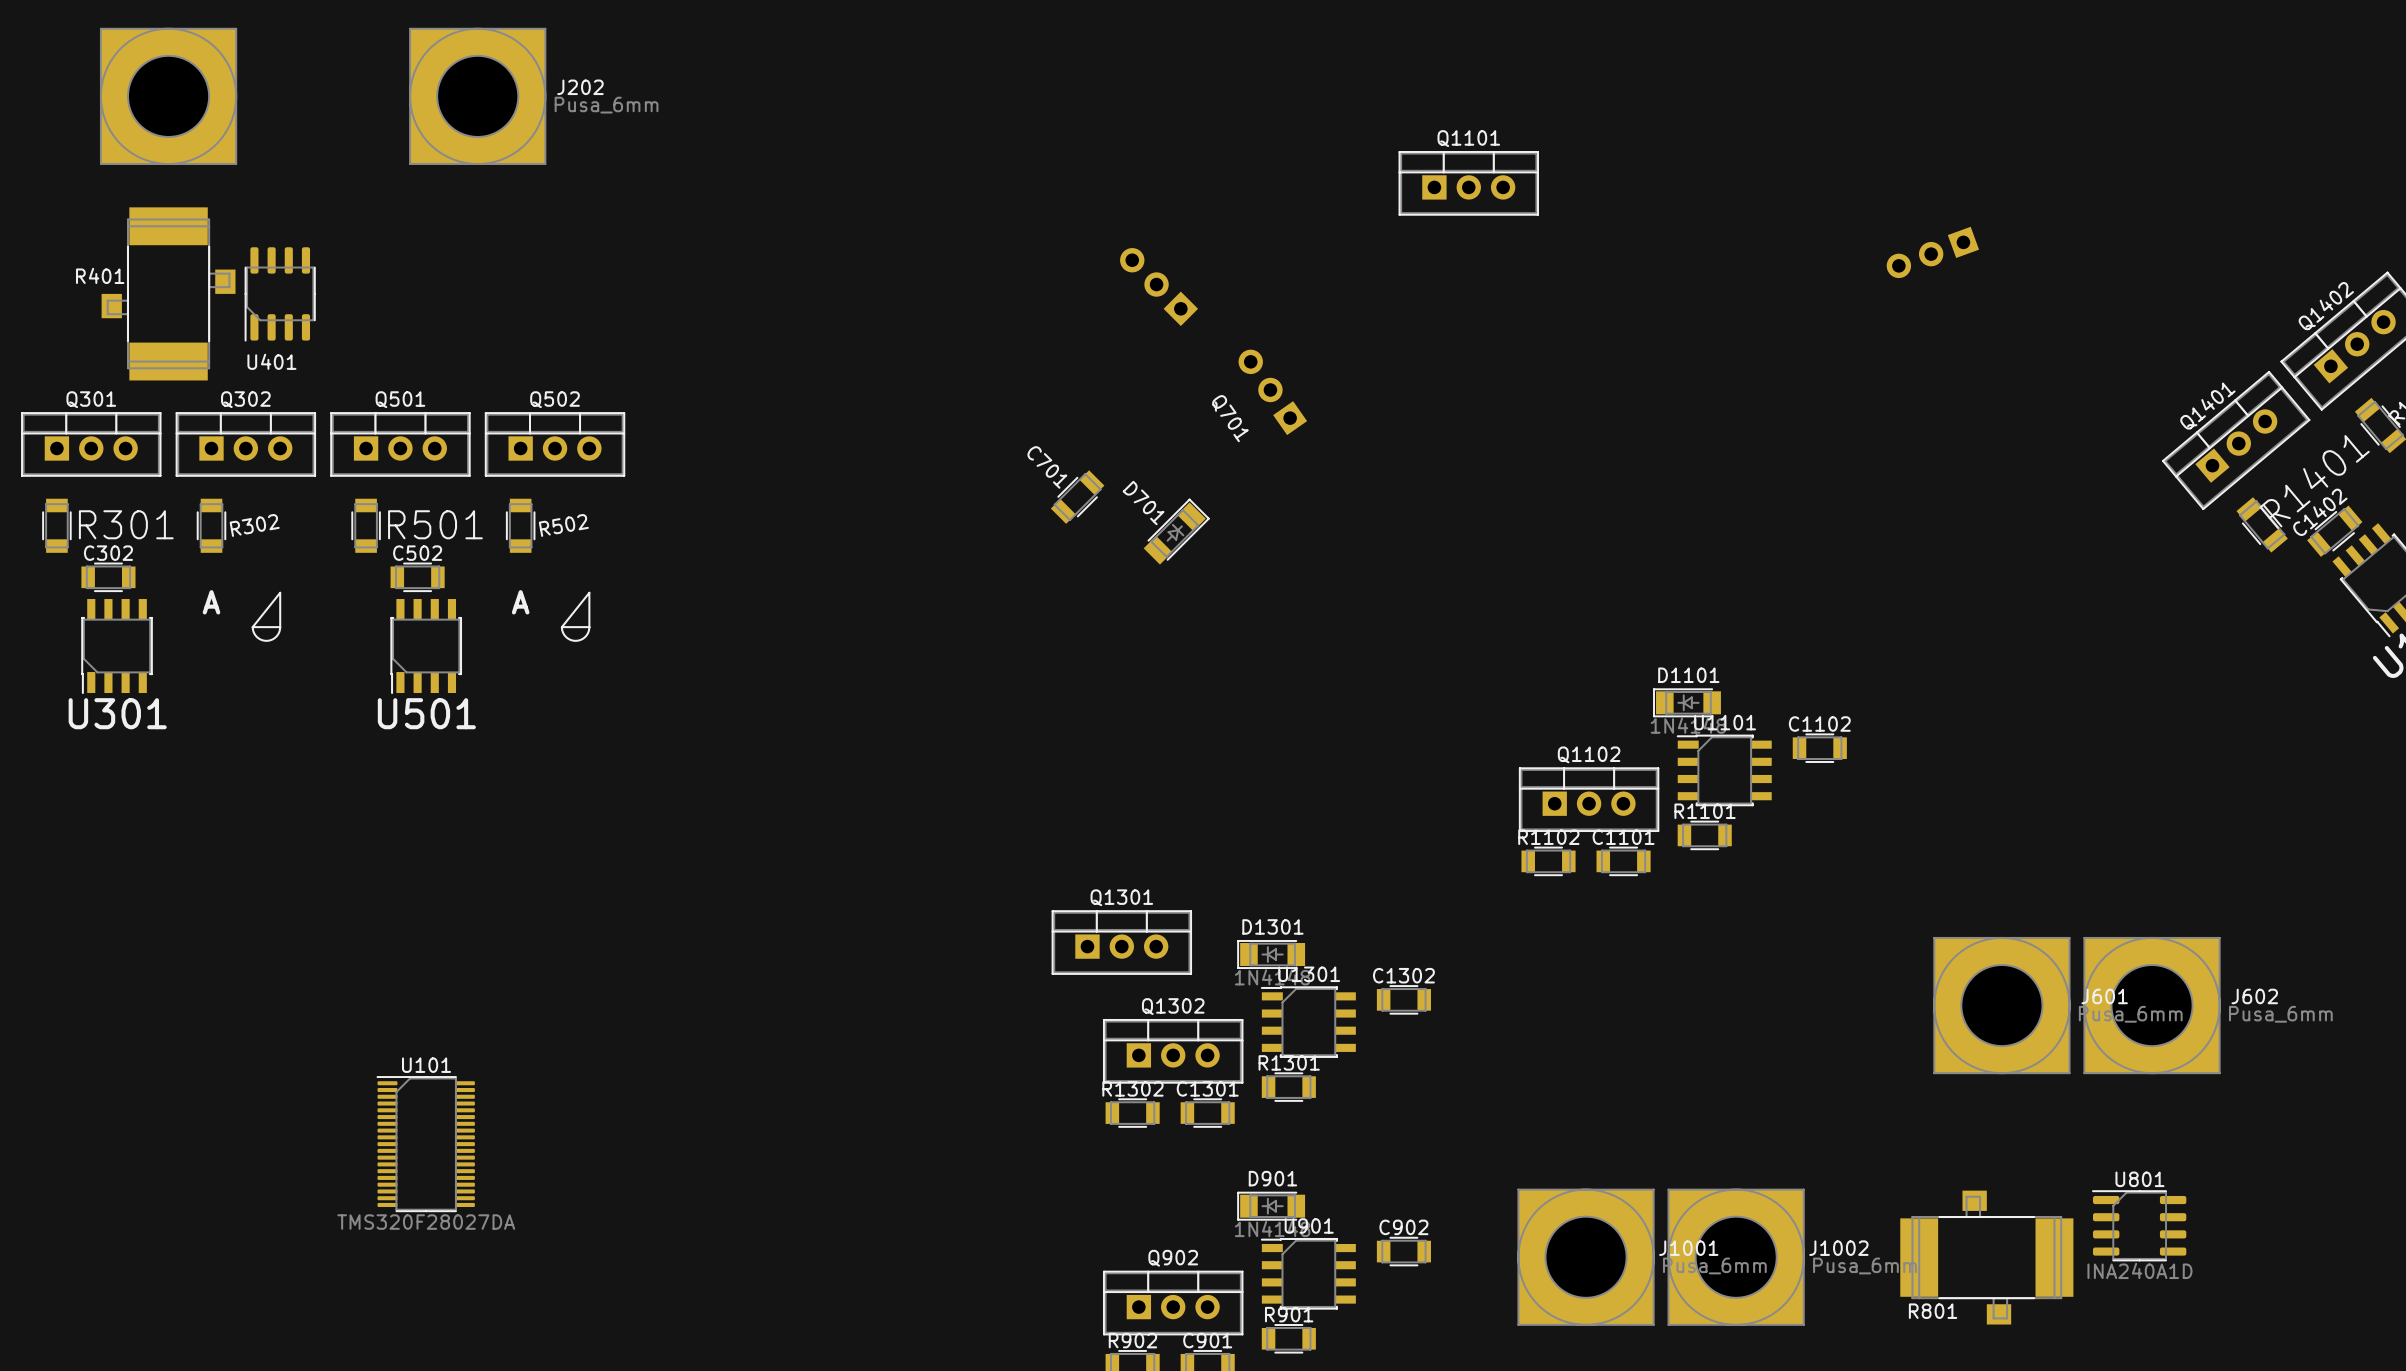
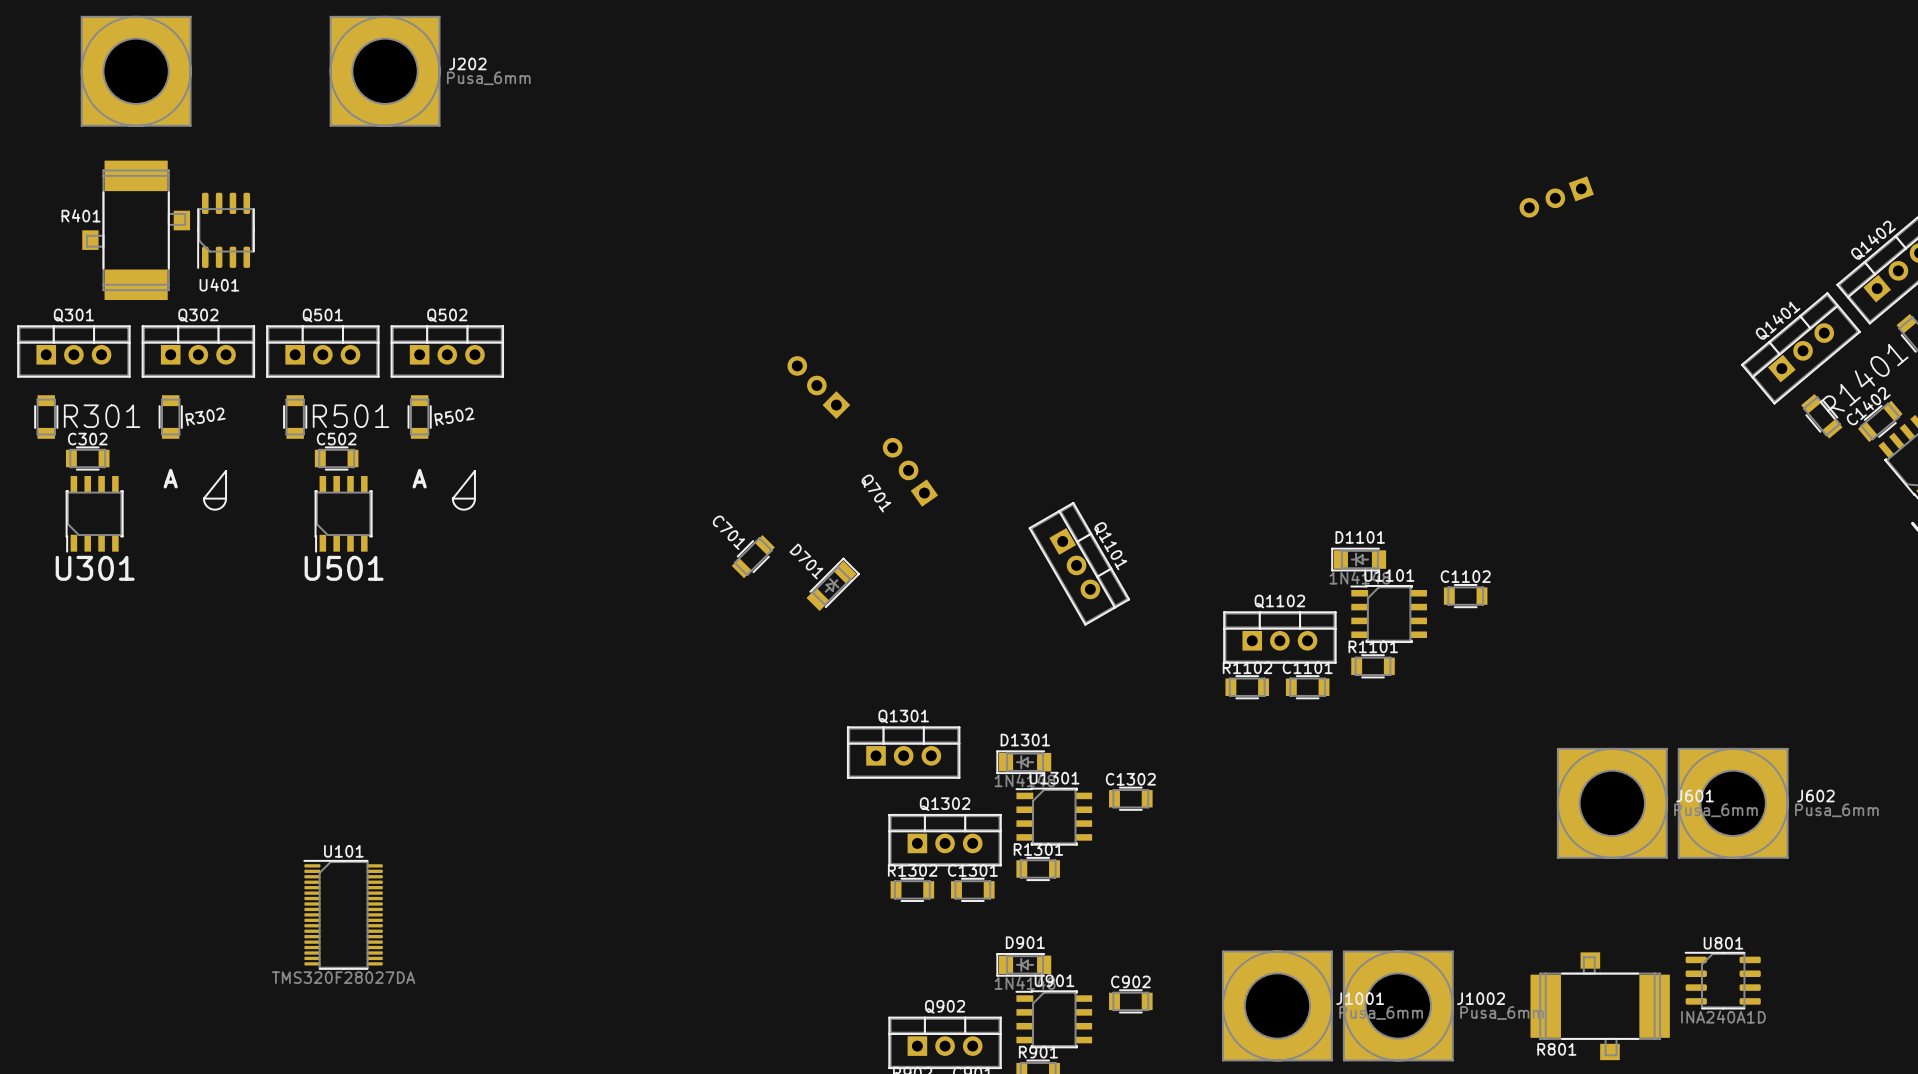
Q1101 rotation: 0° (1468, 183) -> 60° clockwise (1079, 563)
Q1101 position: (1468, 183) -> (1079, 563)
part position: (1159, 287) -> (818, 387)
Q701 position: (1272, 392) -> (910, 472)
C701 position: (1077, 497) -> (753, 556)
D701 position: (1176, 531) -> (833, 584)

